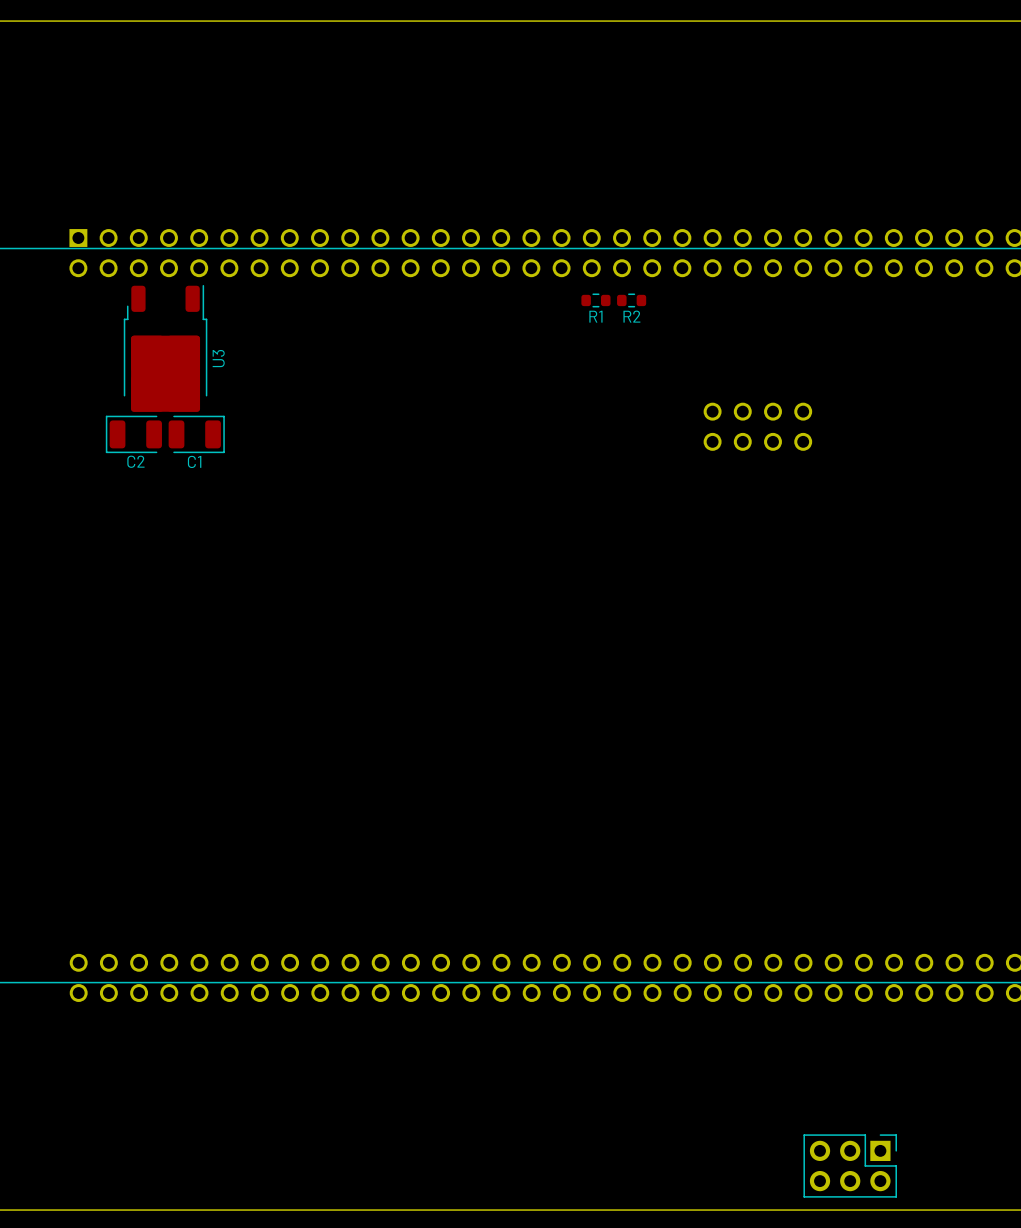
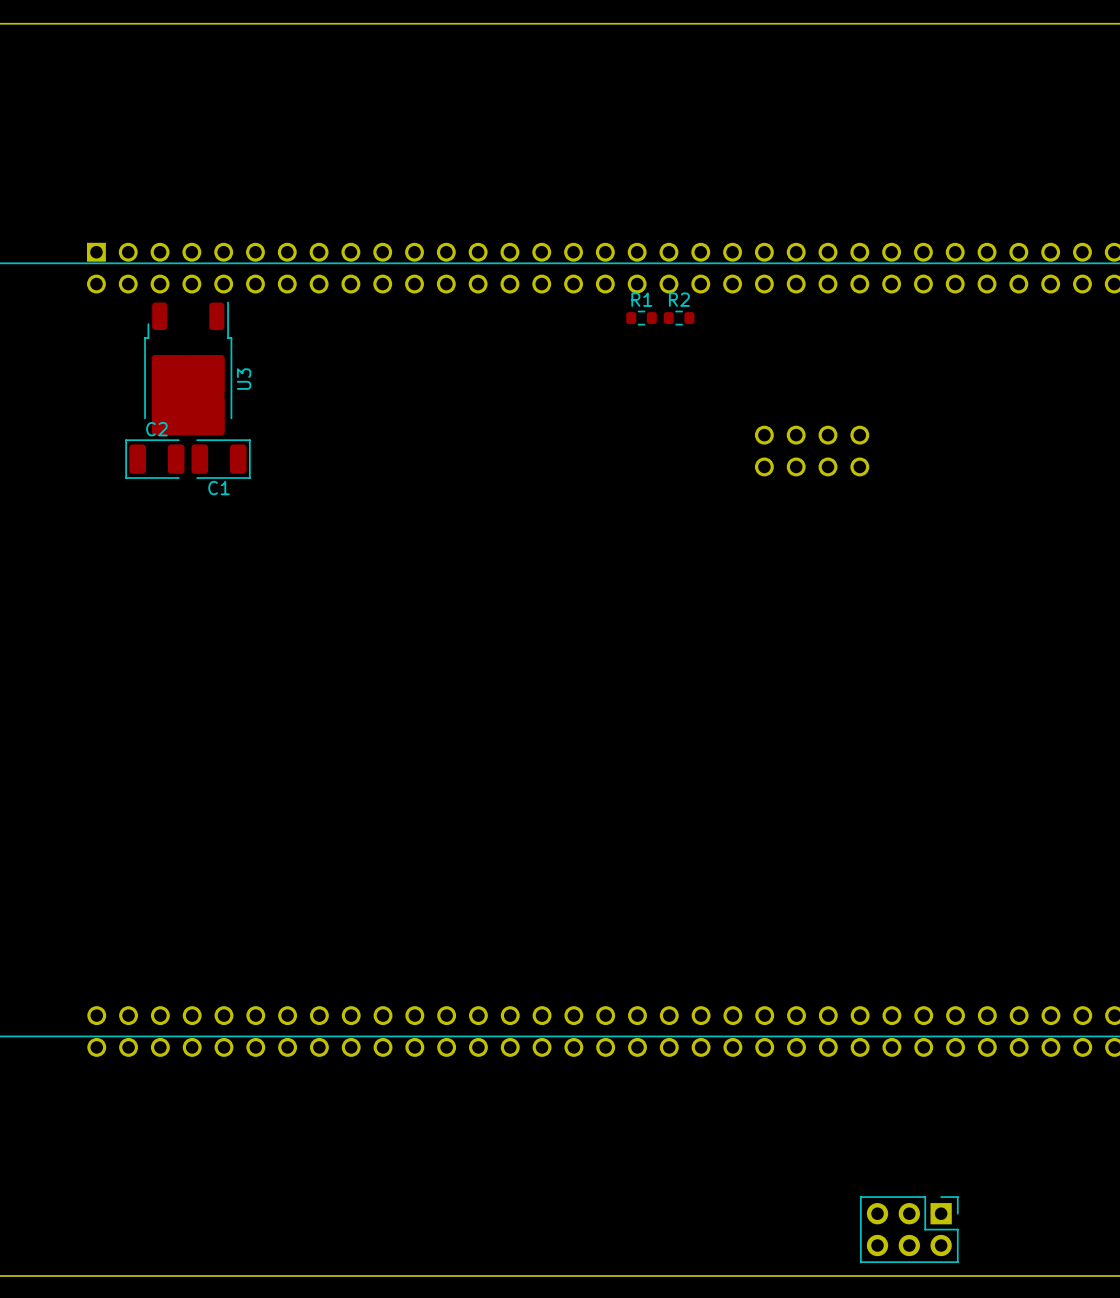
R1 name position: R1 (595, 316) -> R1 (641, 299)
R2 name position: R2 (631, 316) -> R2 (679, 299)
C2 name position: C2 (135, 461) -> C2 (156, 429)

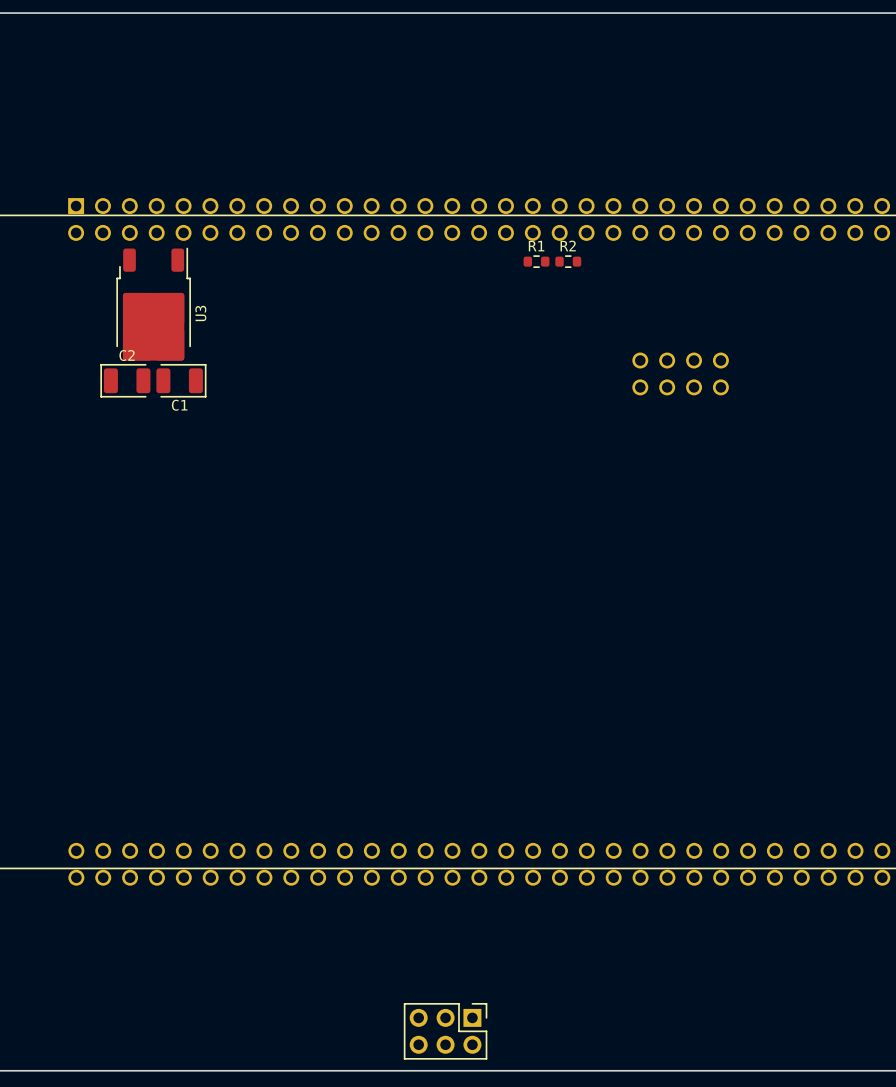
part: none -> (445, 1031)
part: (909, 1229) -> none

